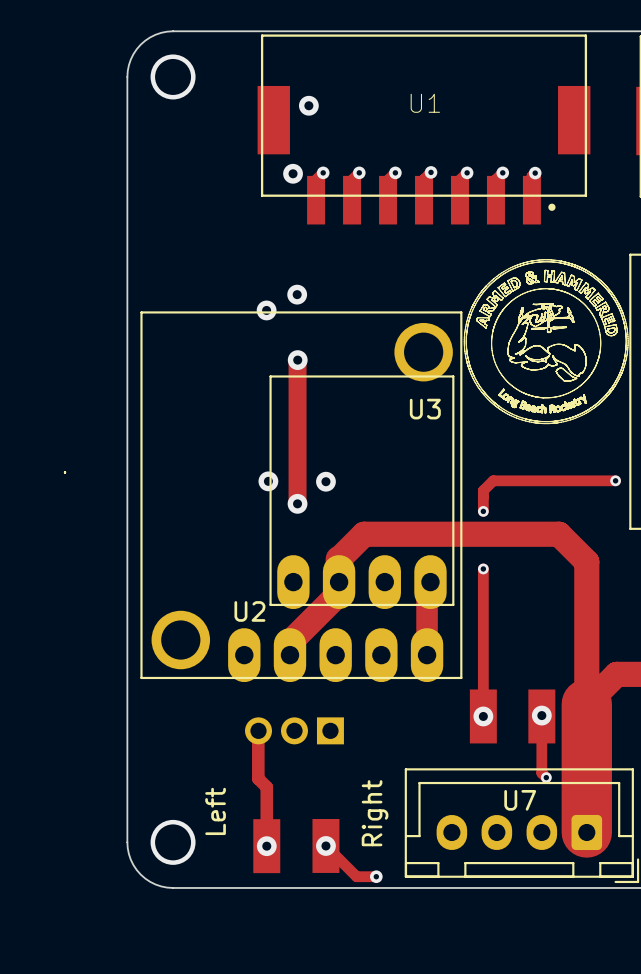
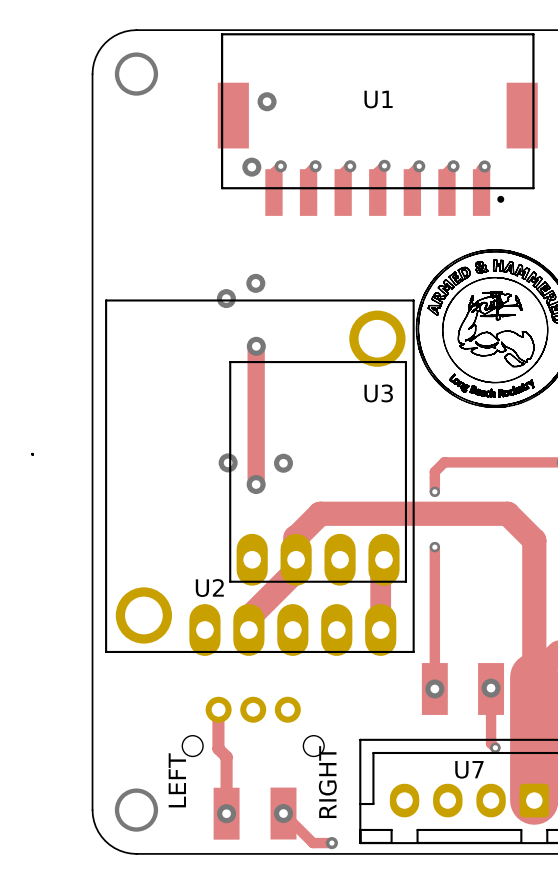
part: (294, 730) -> none
part: none -> (253, 726)
Left name: Left (215, 811) -> LEFT (177, 780)
Right name: Right (375, 813) -> RIGHT (327, 782)

